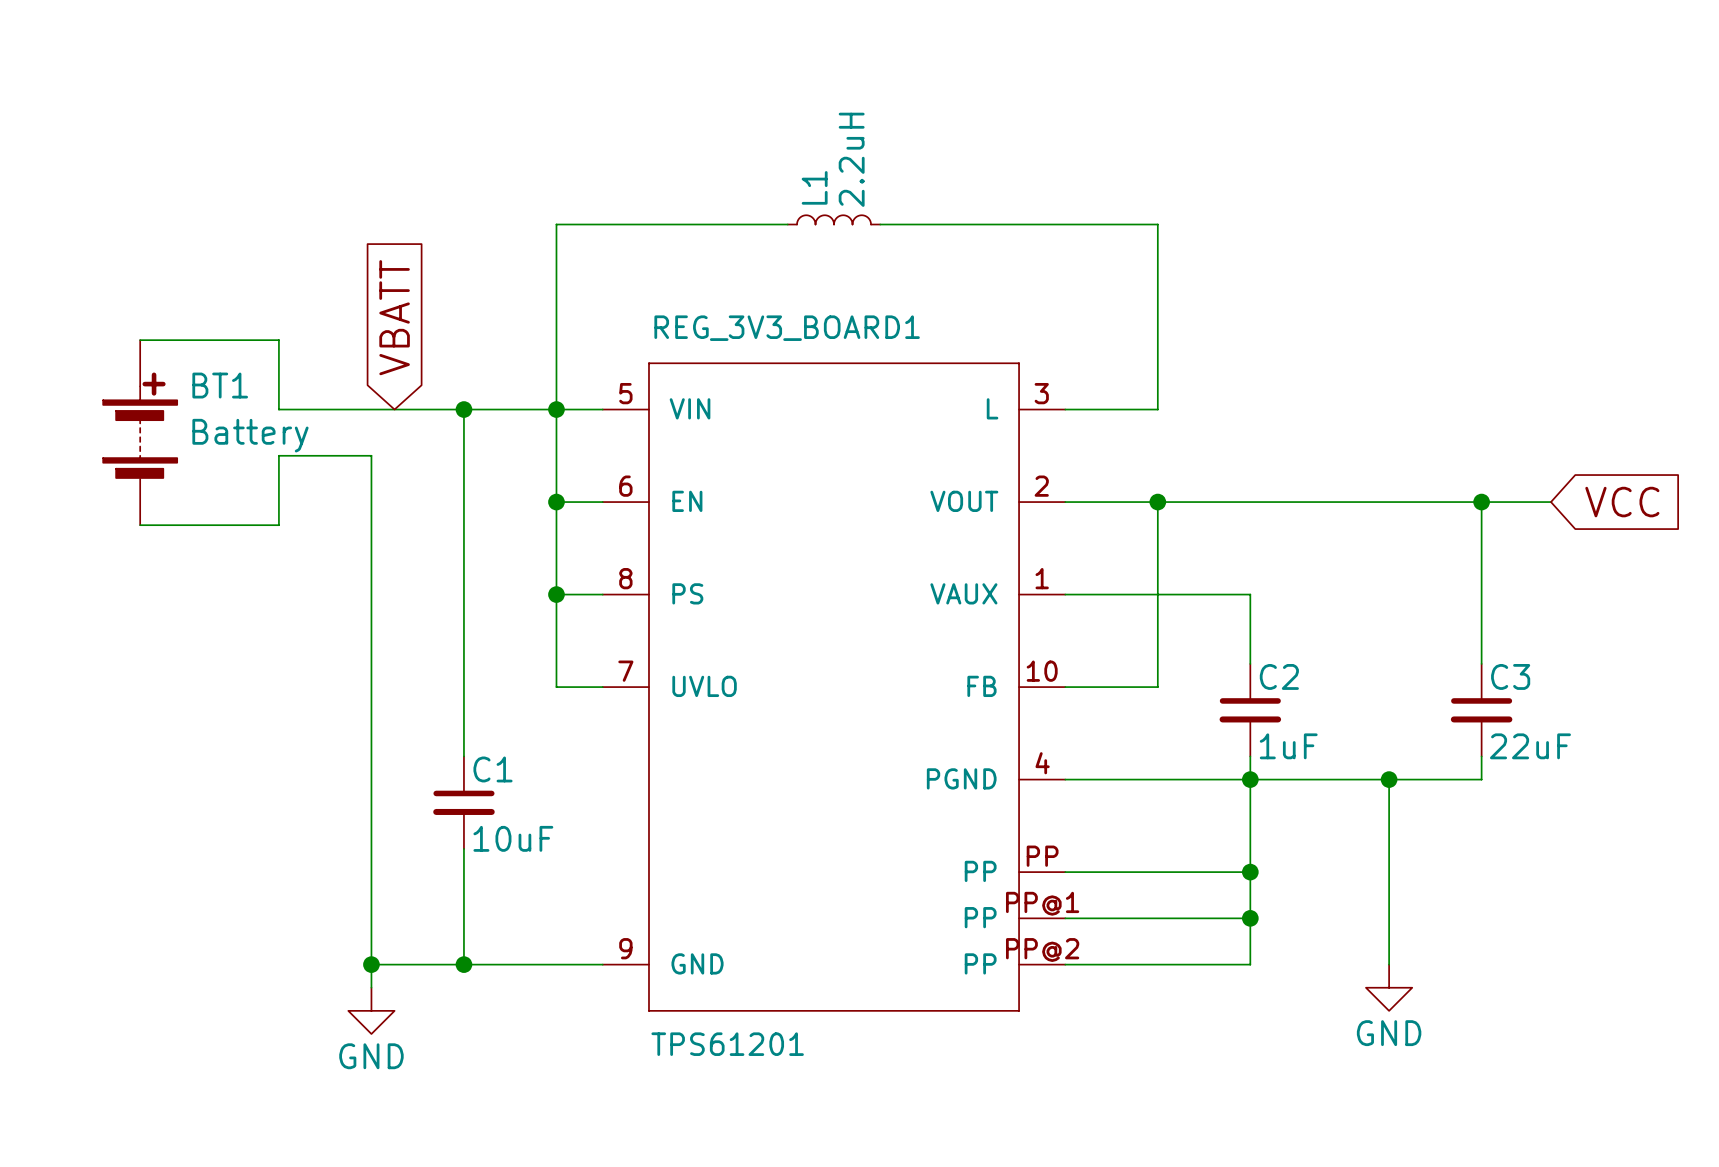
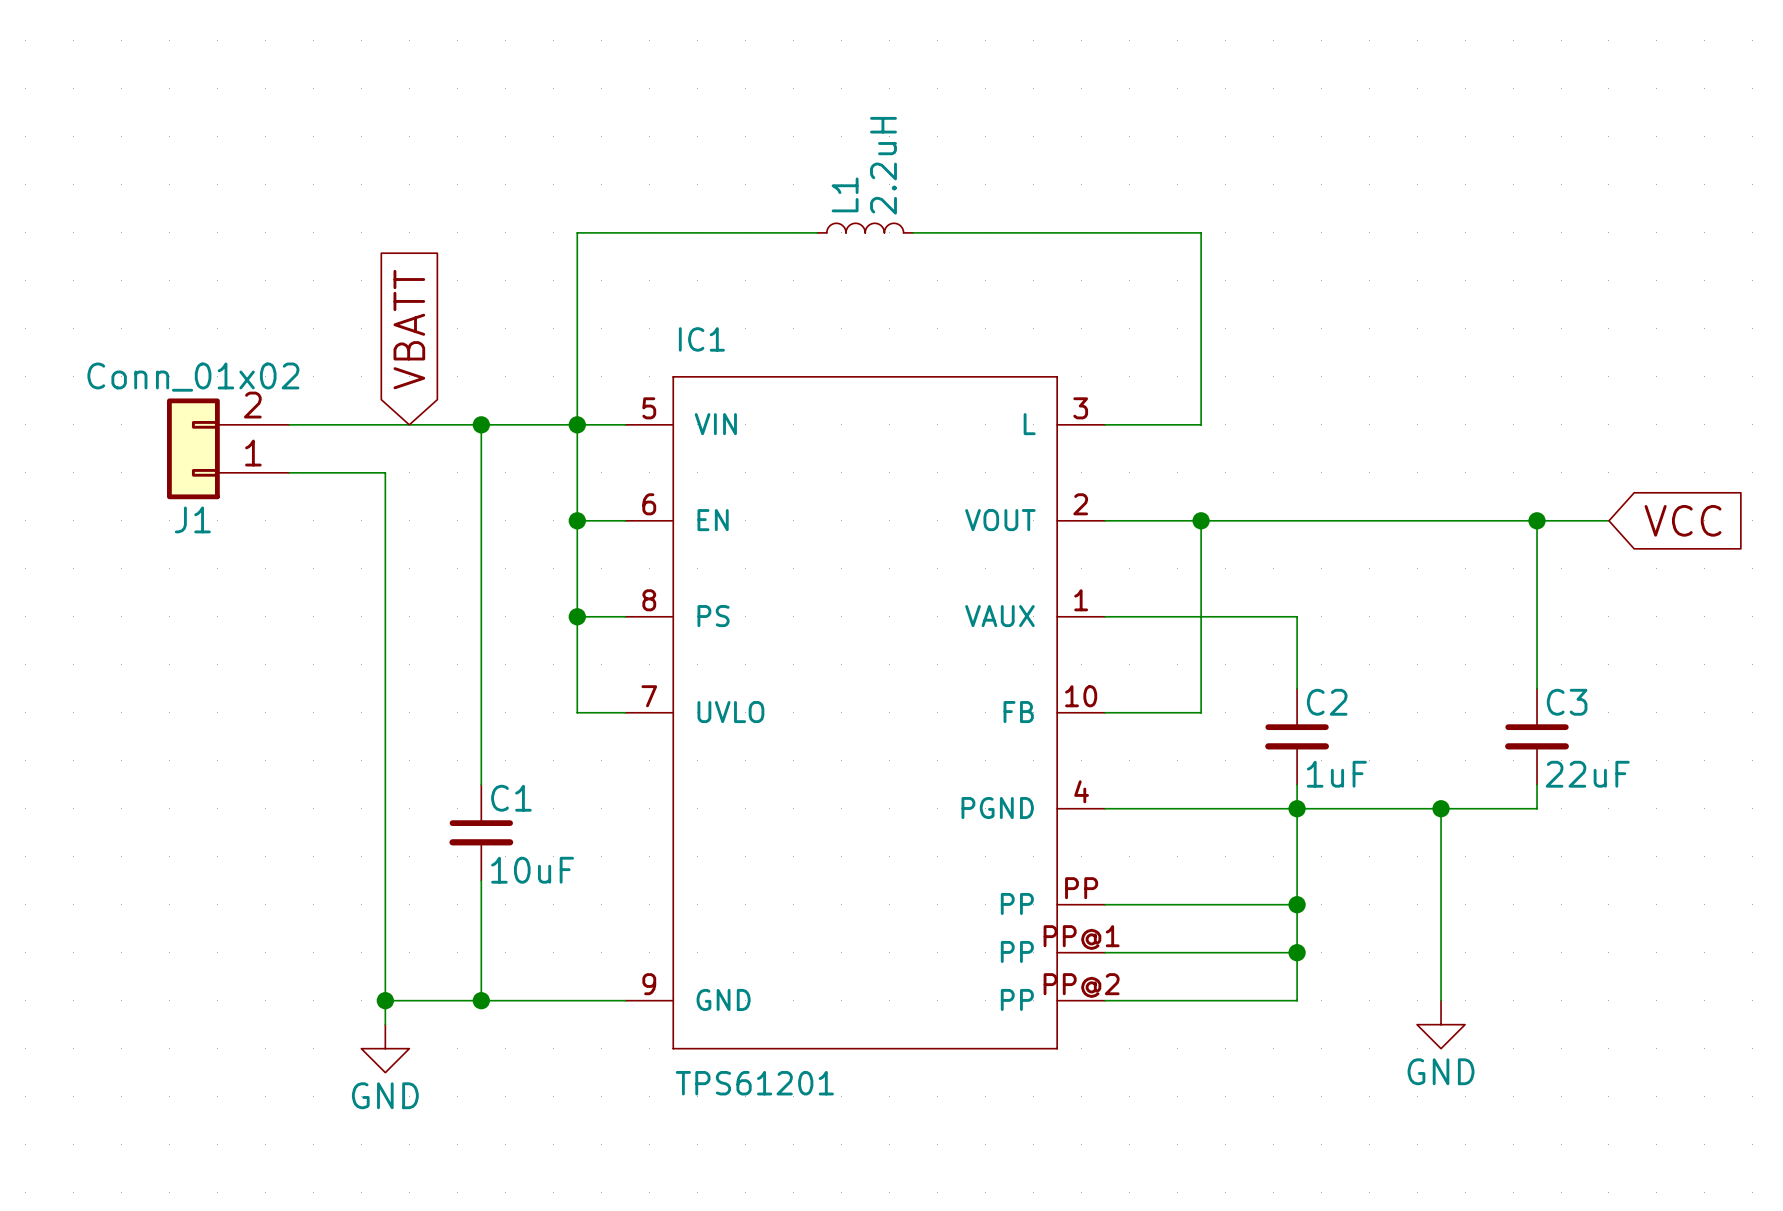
REG_3V3_BOARD1 name: REG_3V3_BOARD1 (787, 328) -> IC1 (701, 339)
wire: (140, 340) (278, 340) (278, 409) -> none
BT1: Battery (140, 432) -> none
J1: none -> Conn_01x02 (228, 448)
wire: (278, 455) (278, 525) (140, 525) -> none

